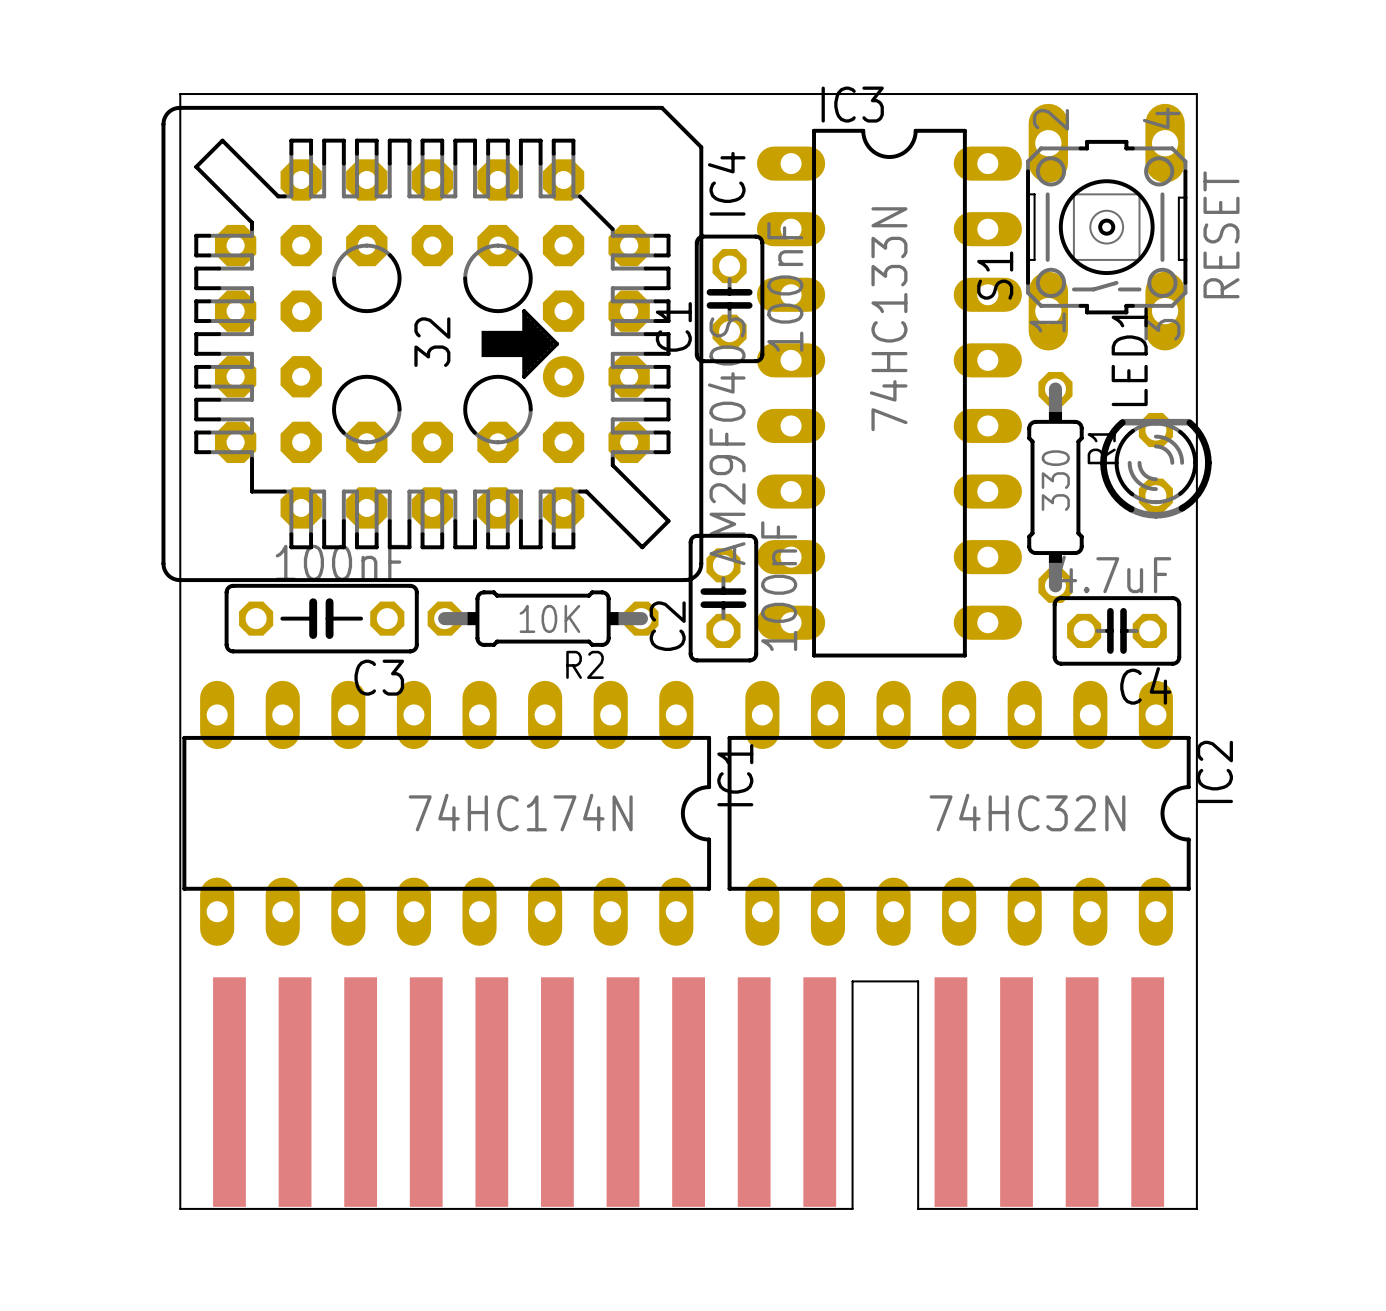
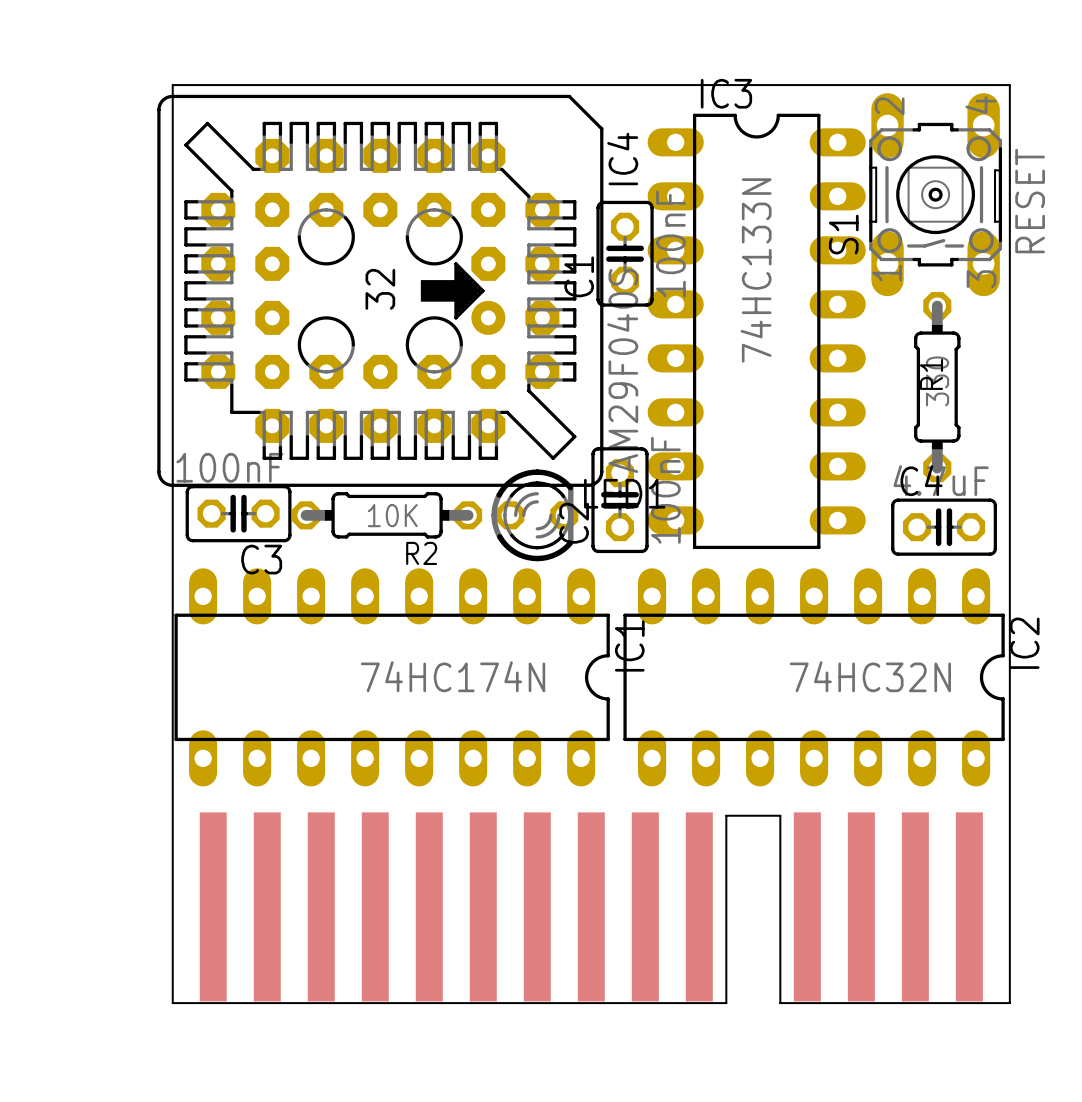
LED1 rotation: 0° (1155, 465) -> 90° clockwise (534, 515)
LED1 position: (1155, 465) -> (534, 515)
R1 position: (1055, 487) -> (937, 387)
C3 footprint: [224, 583, 419, 654] -> [185, 485, 292, 543]
R2 position: (543, 618) -> (387, 515)
C4 name position: C4 (1145, 685) -> C4 (921, 480)

